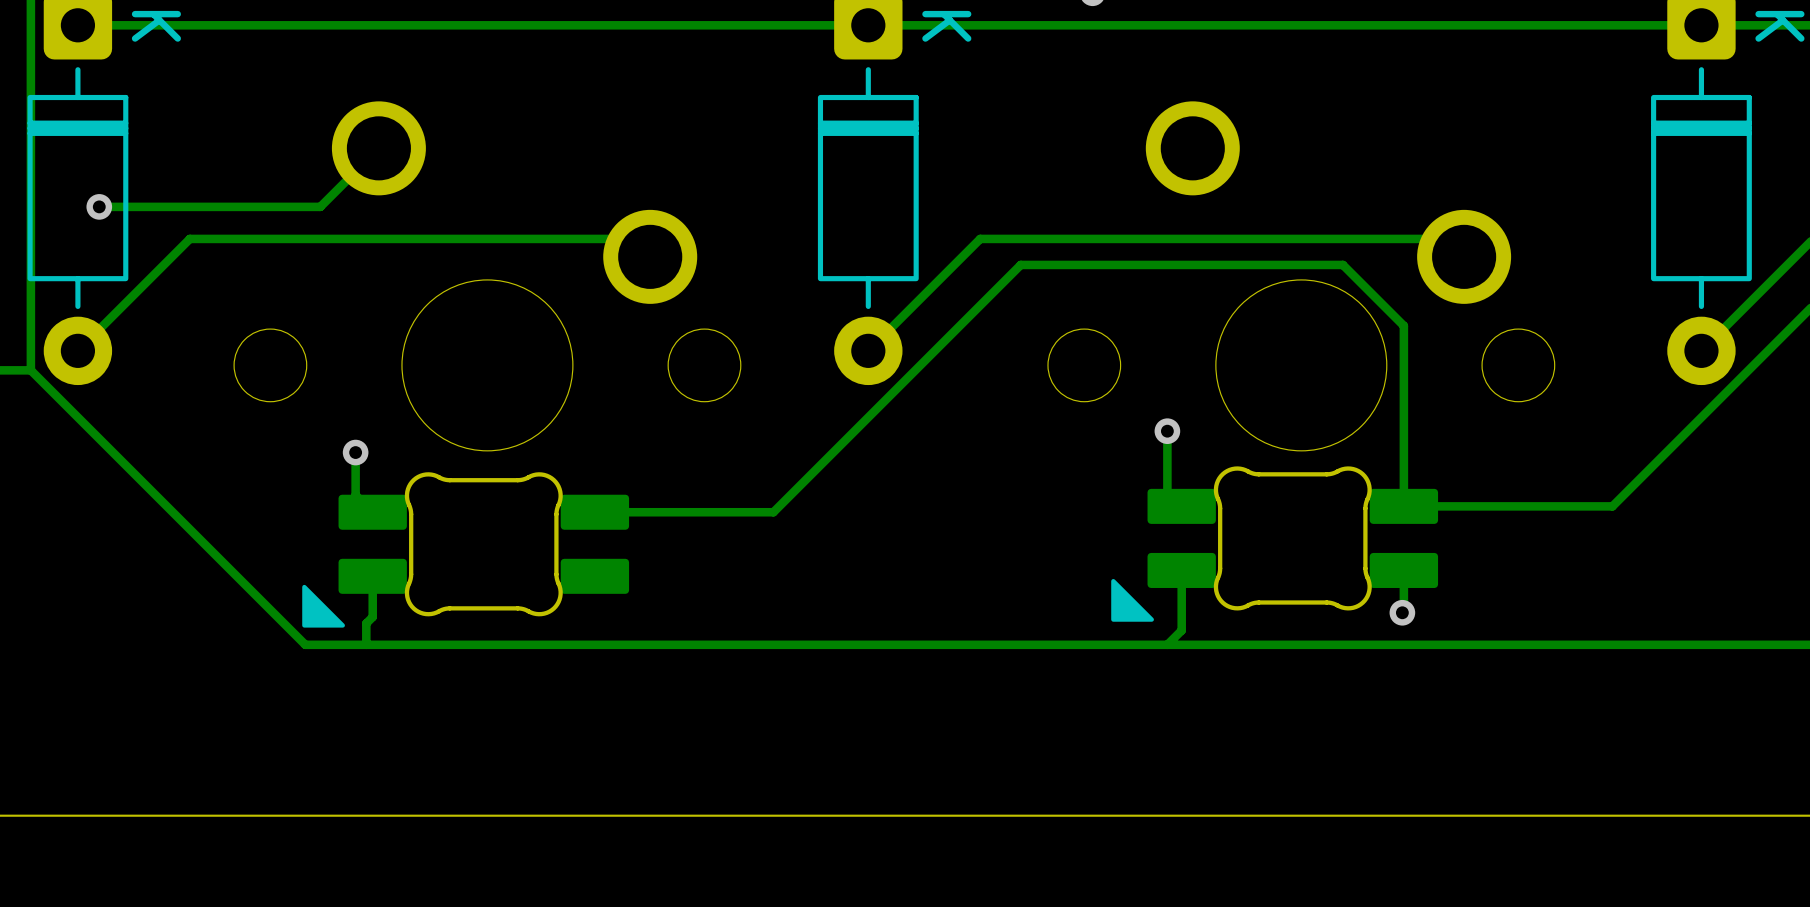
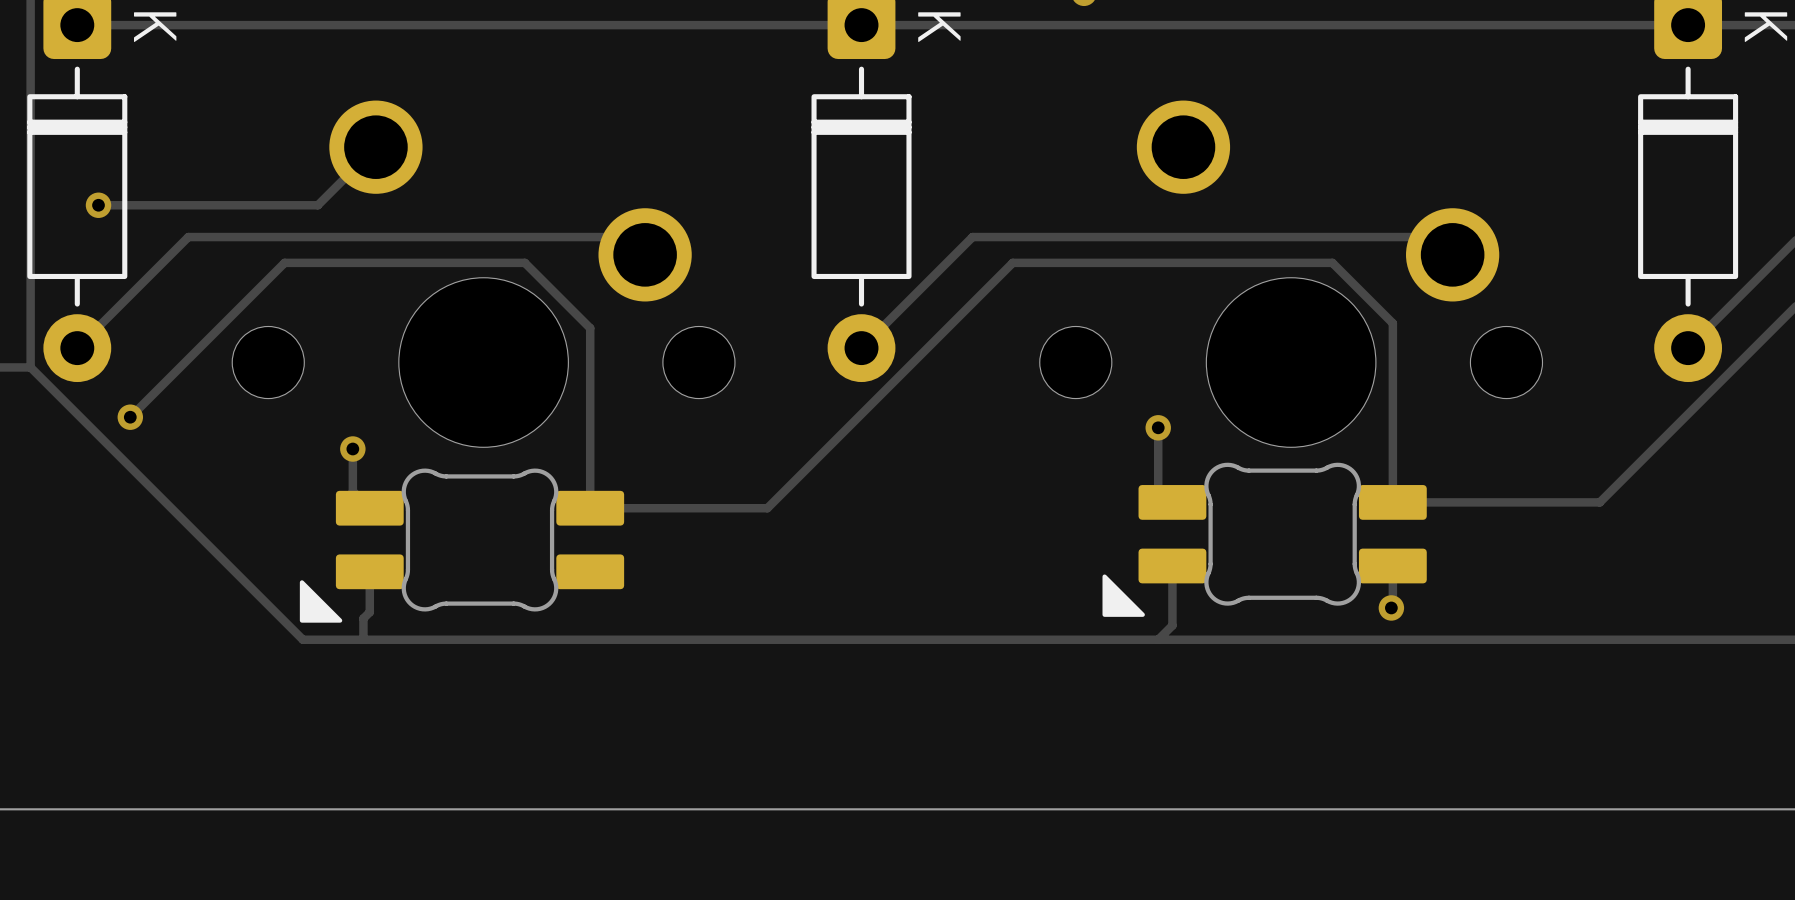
track: none -> (130, 417) (284, 262) (524, 262) (590, 328) (590, 508)
via: none -> (130, 417)

